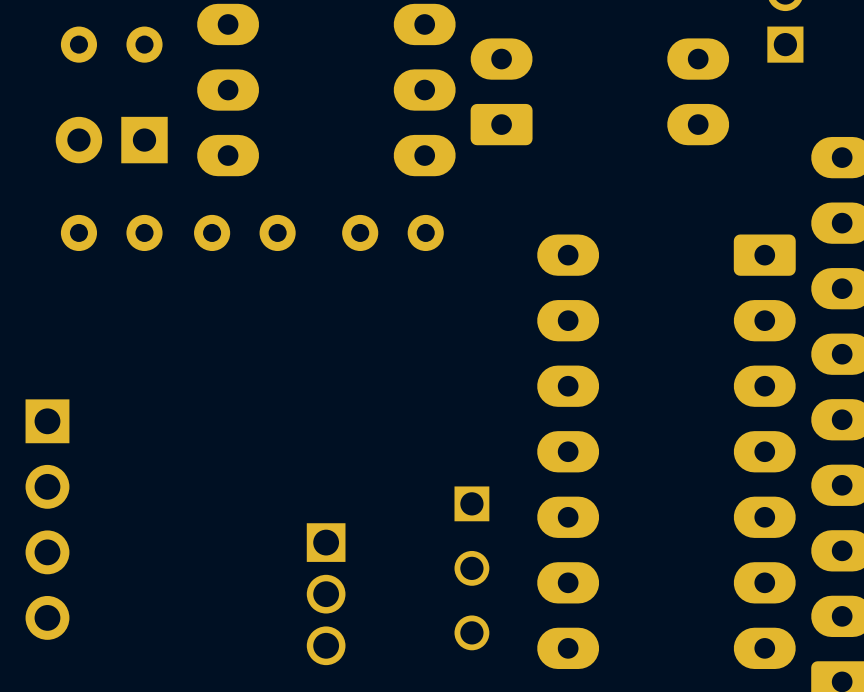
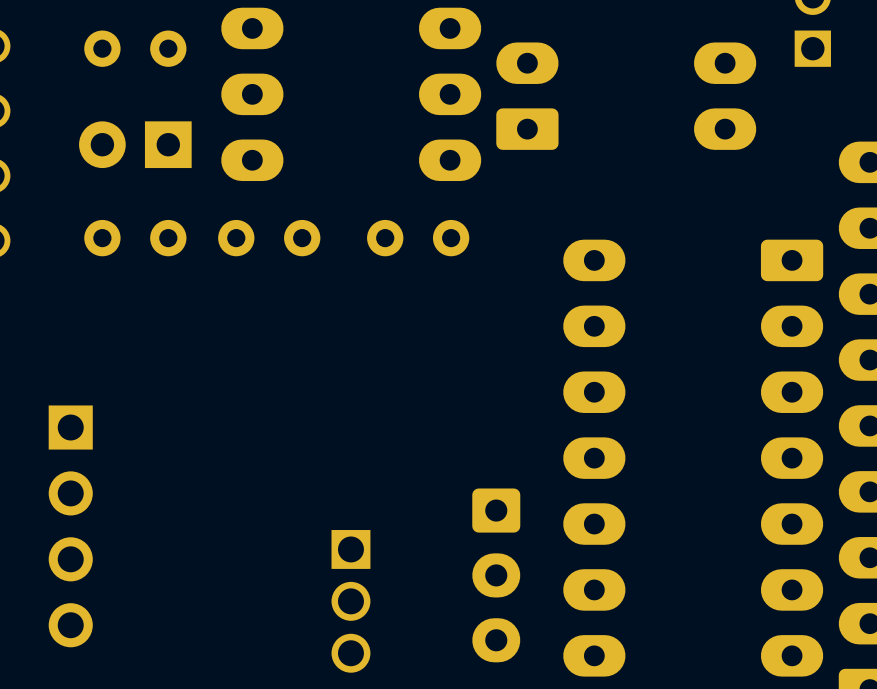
part footprint: [454, 486, 490, 651] -> [472, 488, 521, 663]

